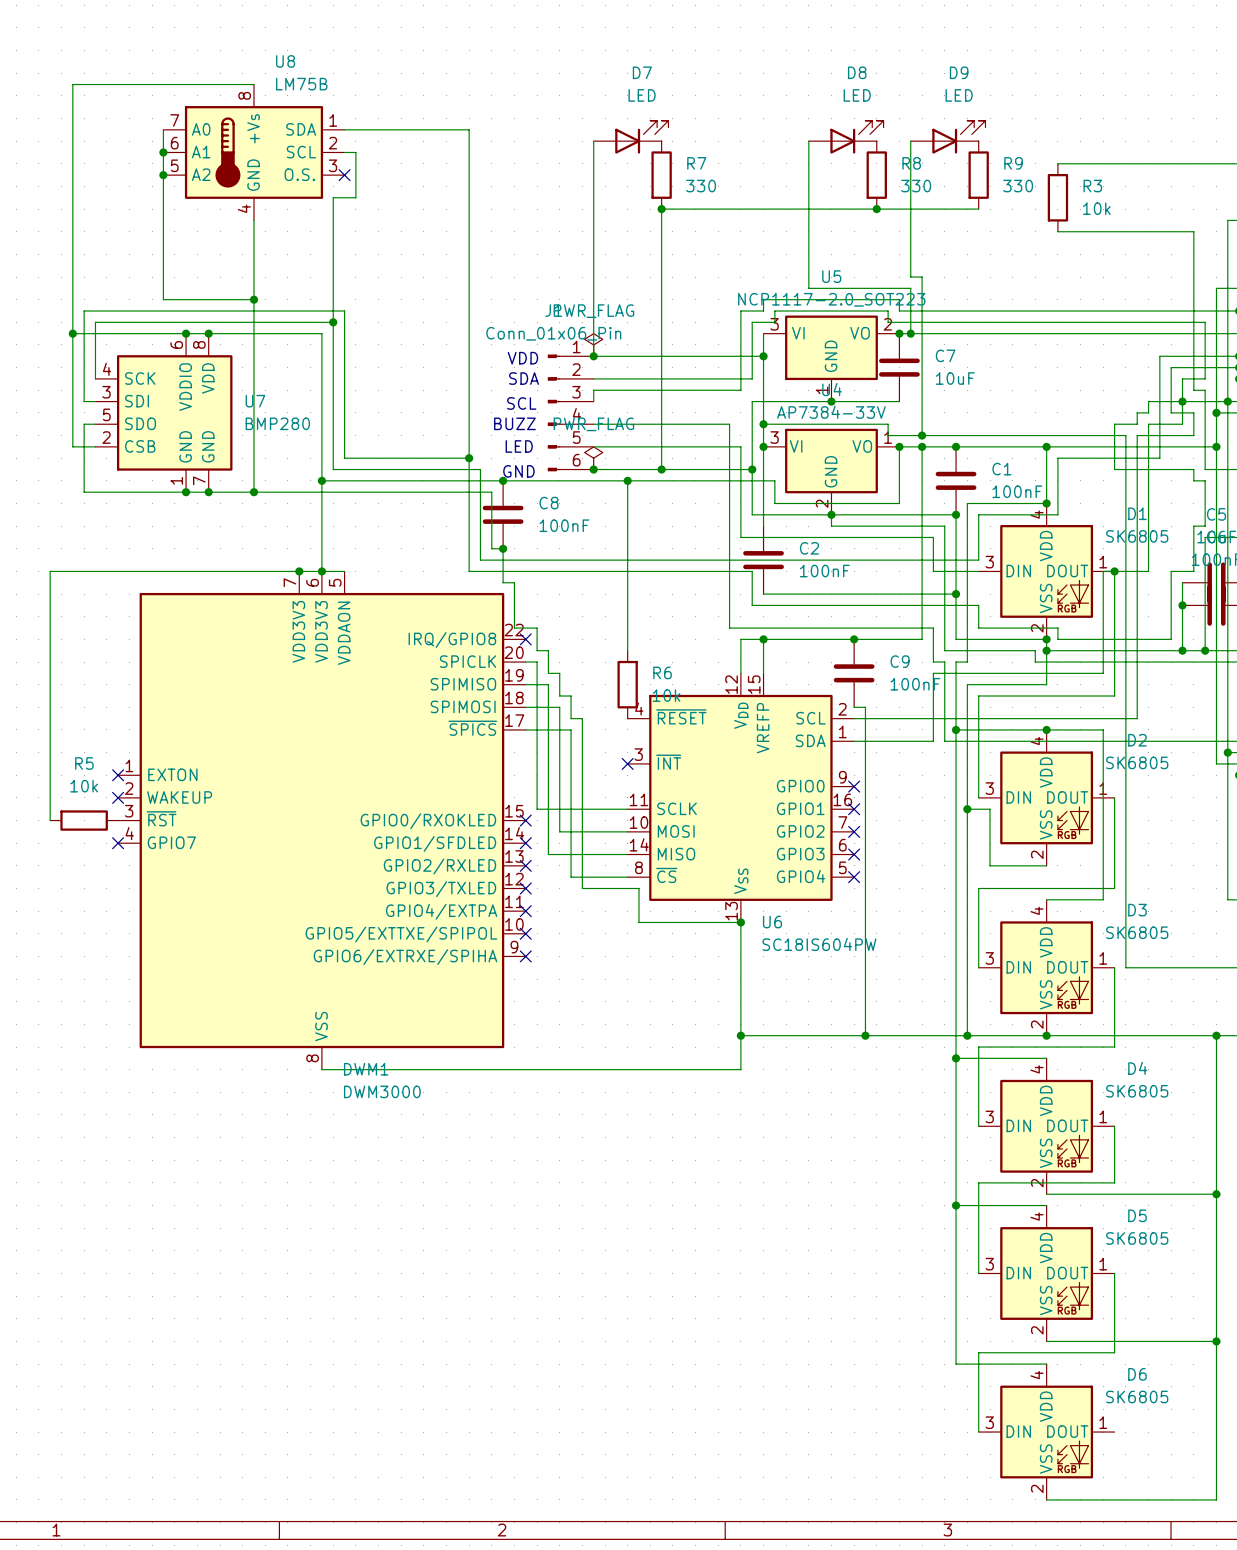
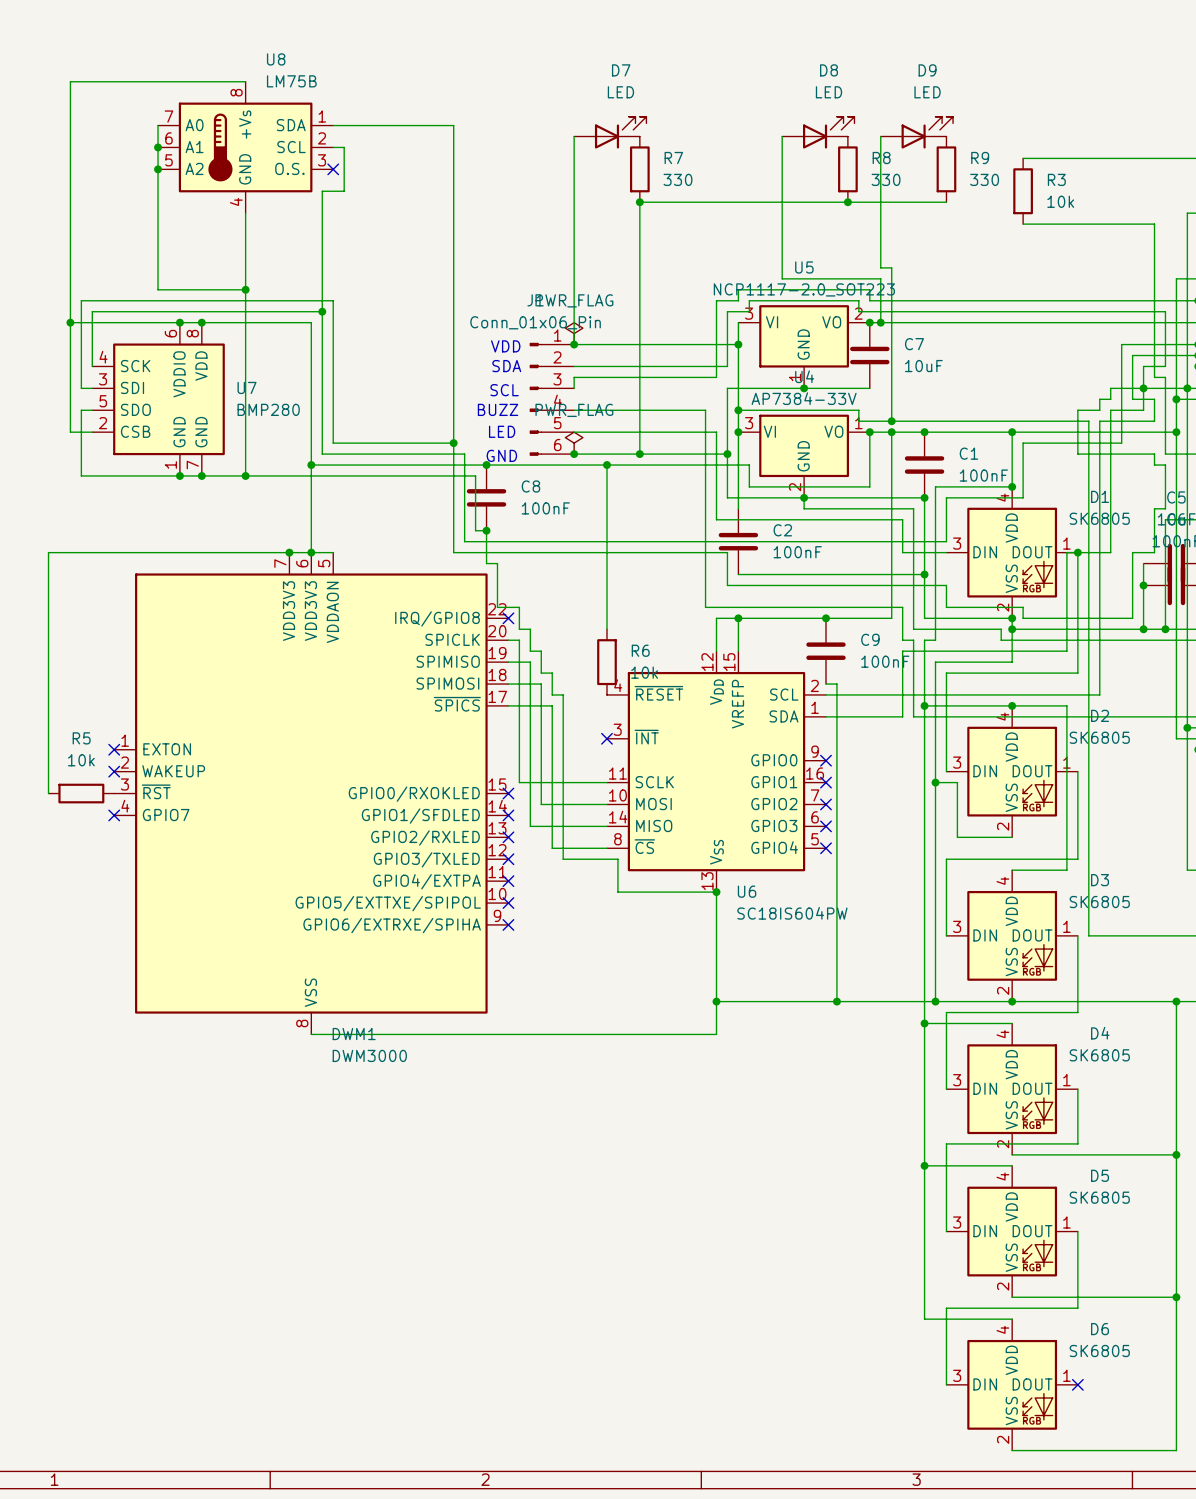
no-connect mark: none -> (1077, 1384)

